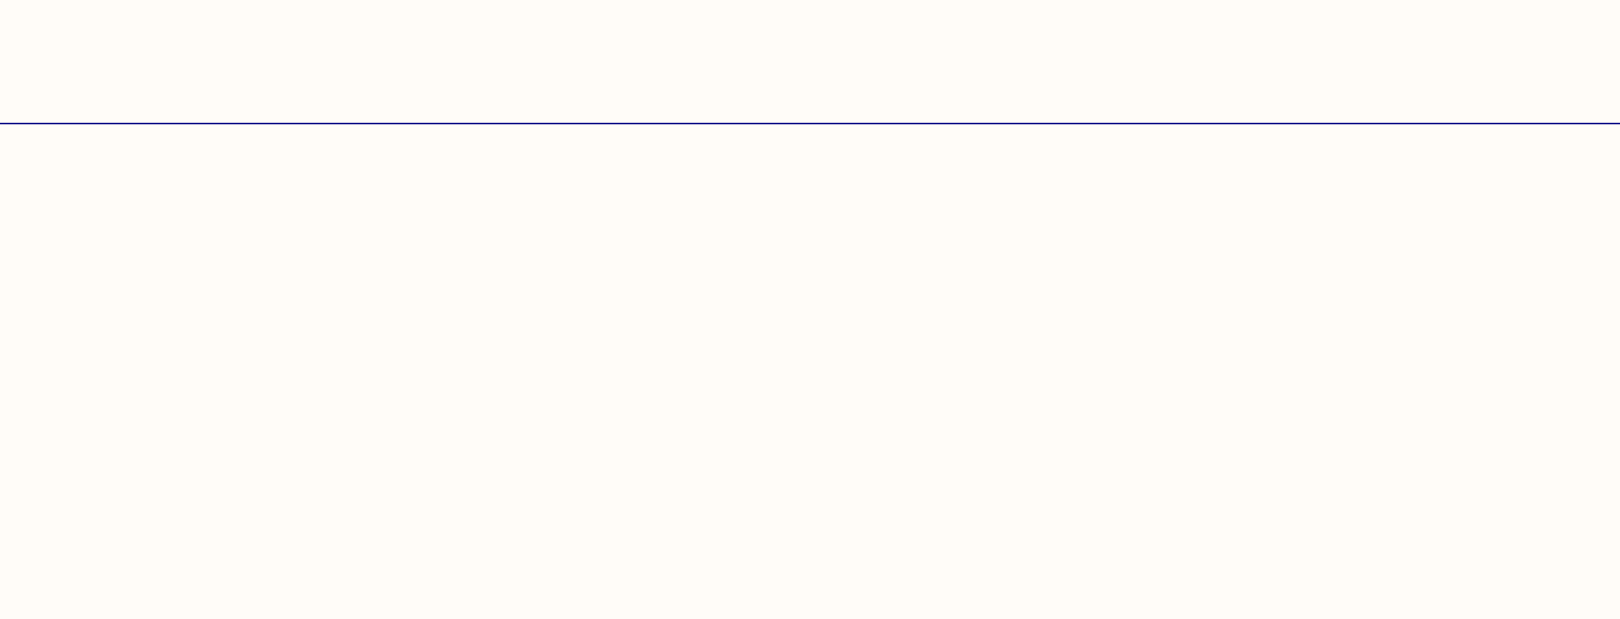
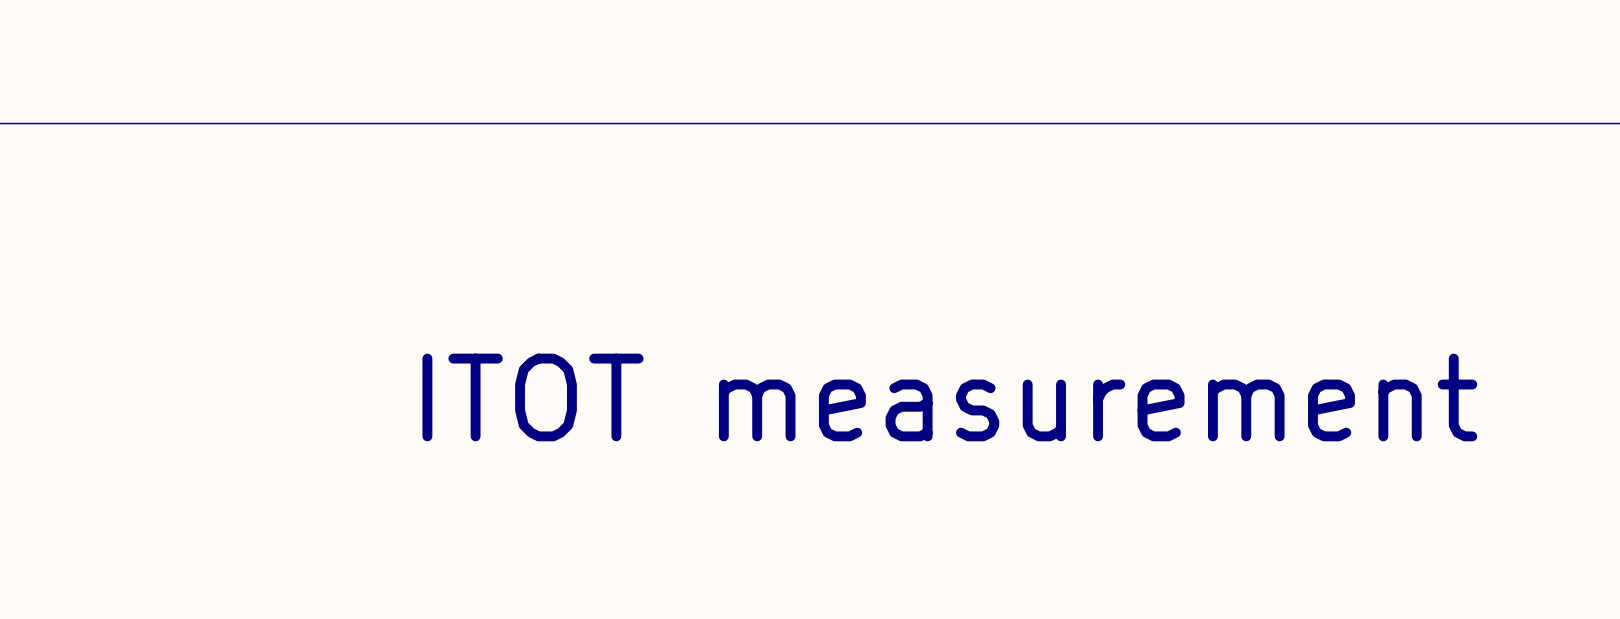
text: none -> ITOT measurement (949, 397)

